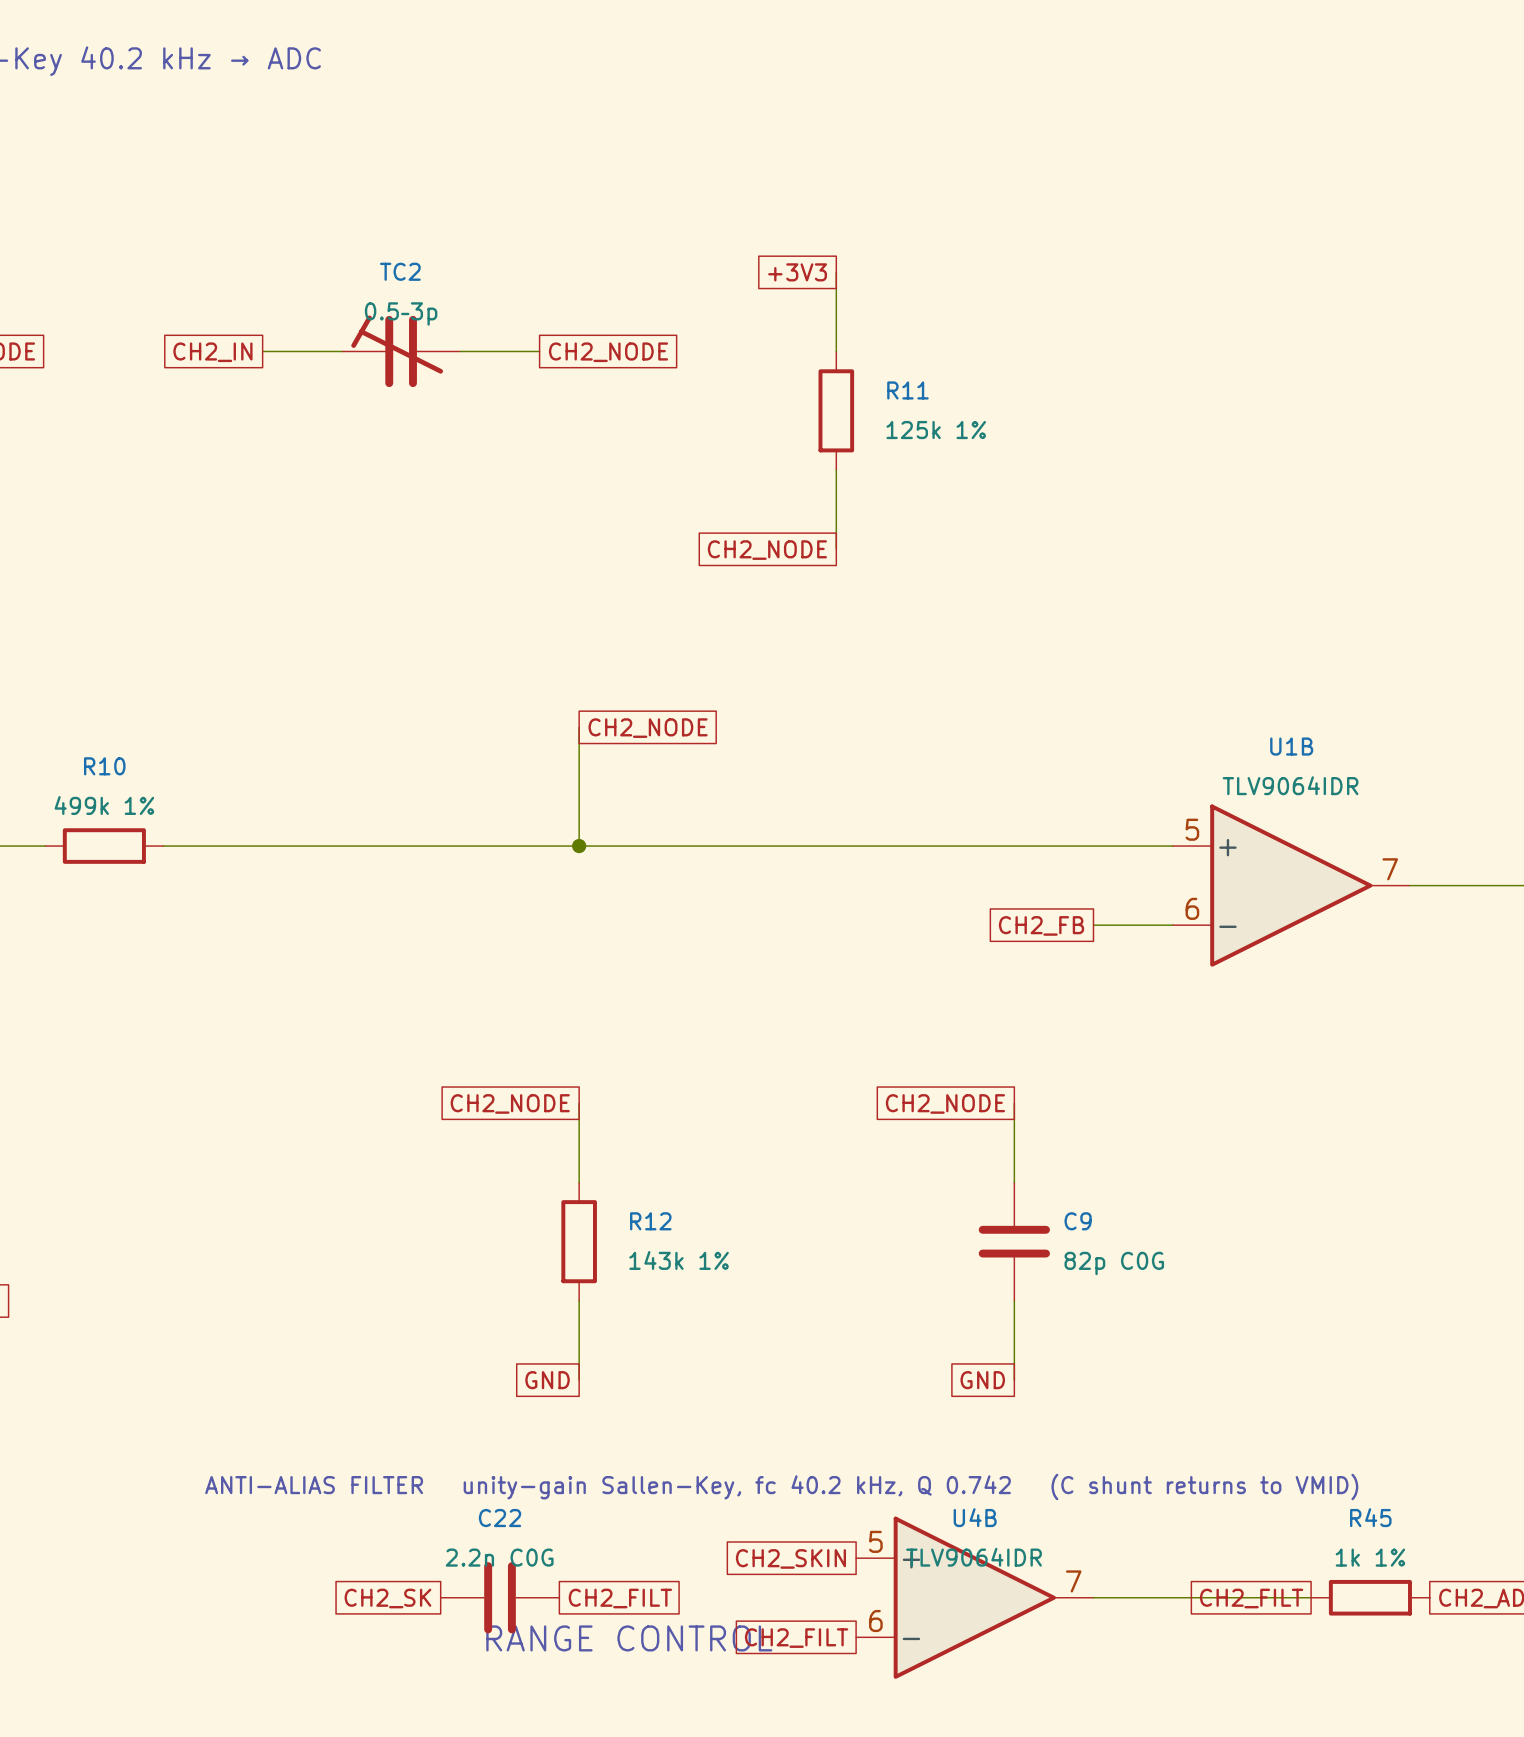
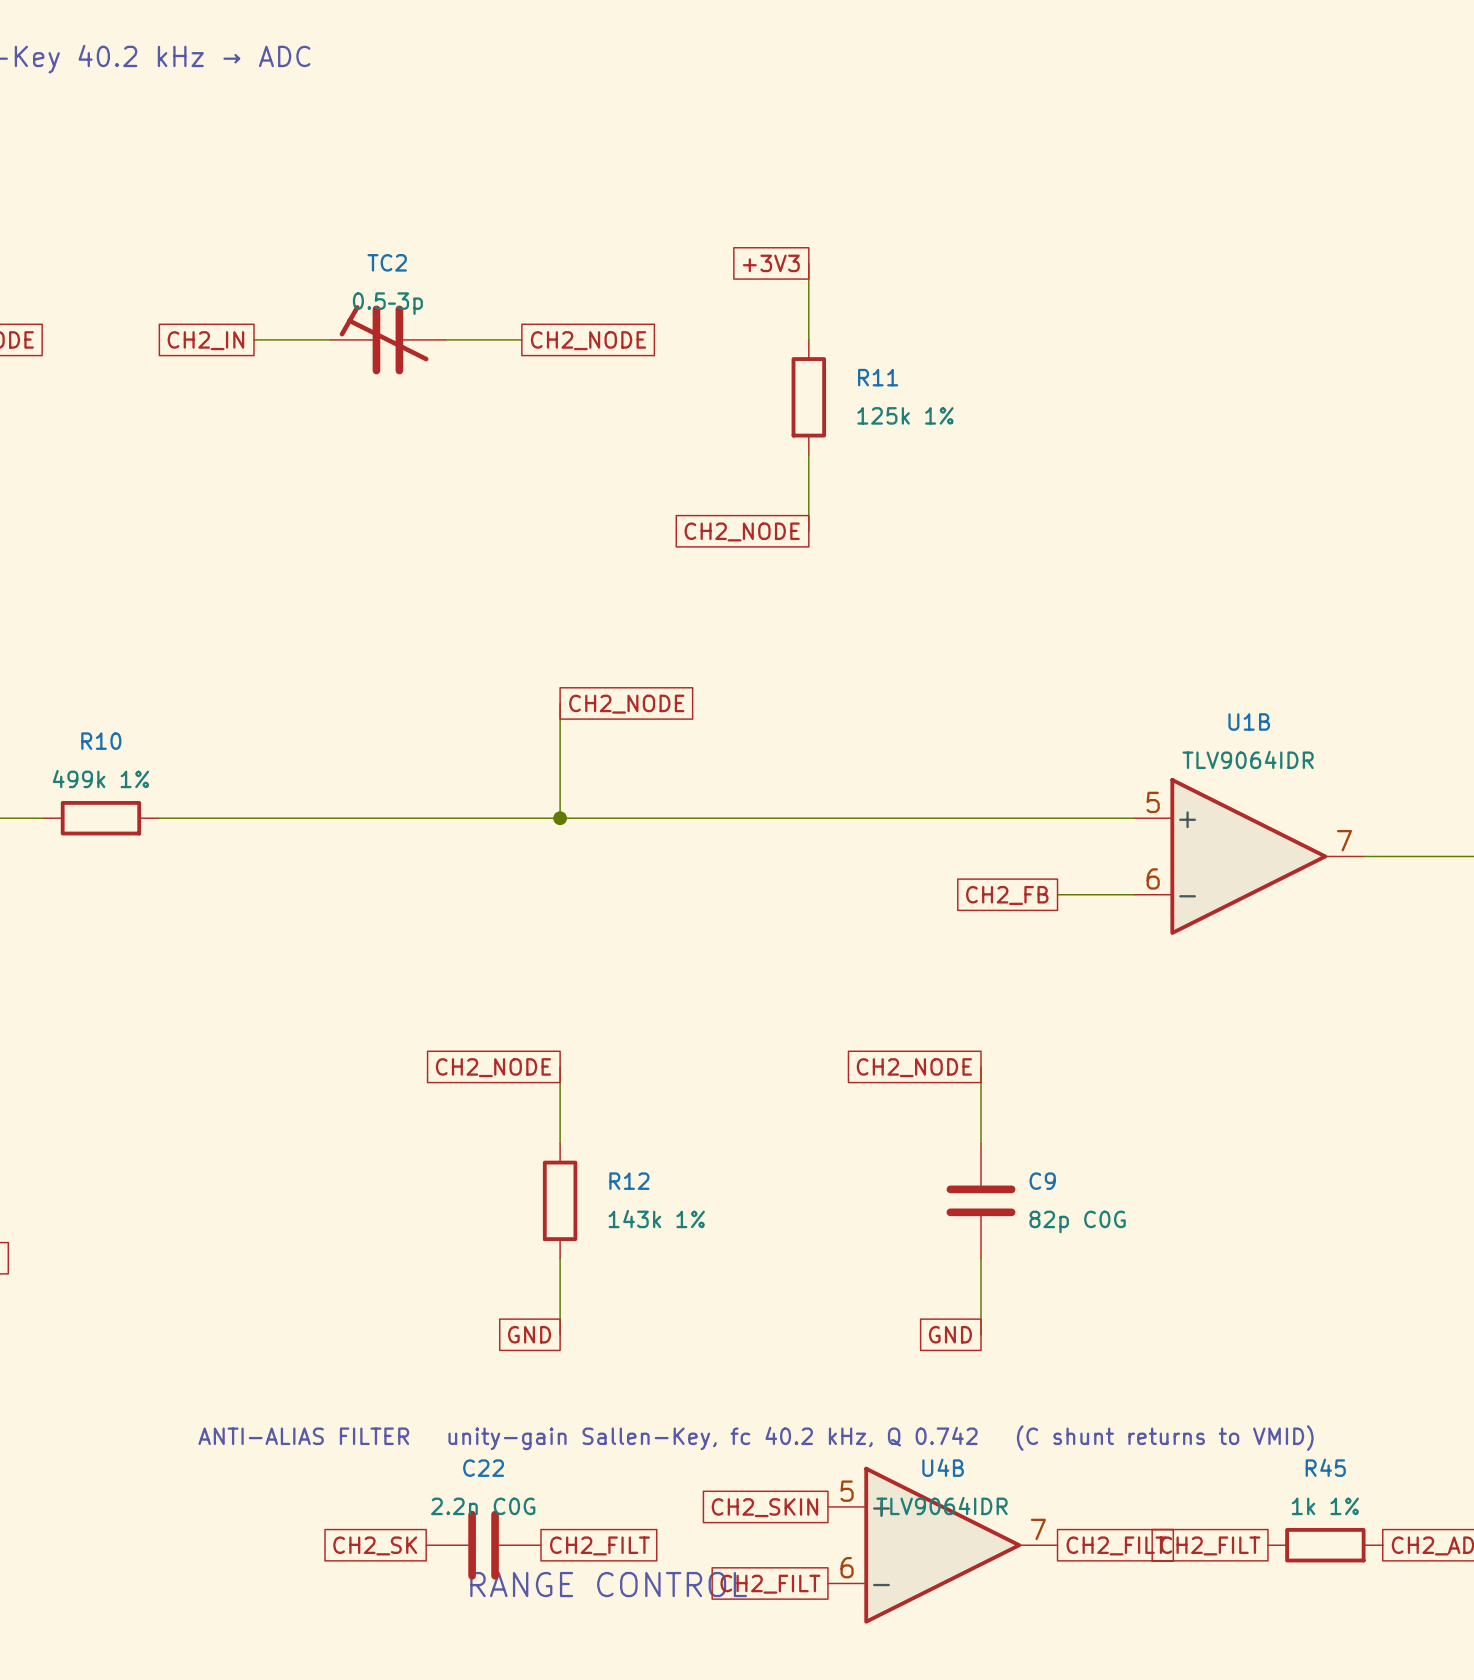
wire: (1093, 1597) (1311, 1597) -> none
global label: none -> CH2_FILT (1116, 1545)

